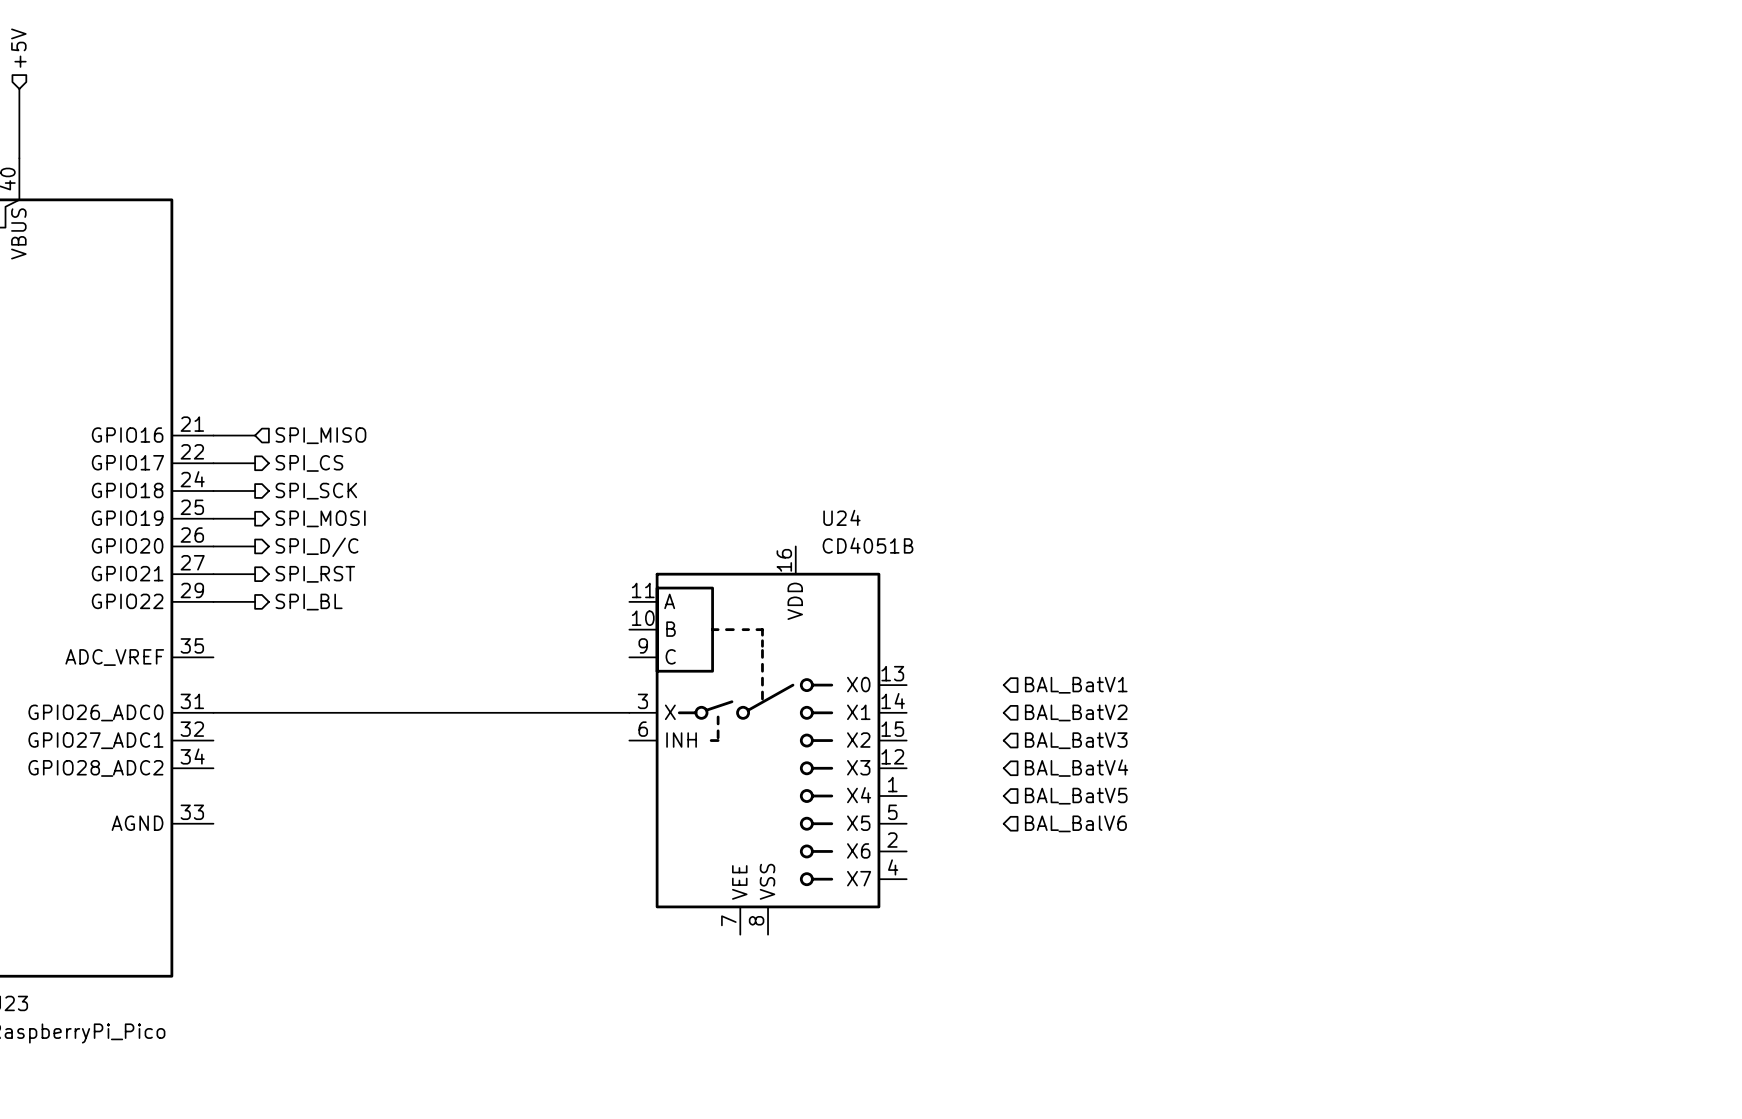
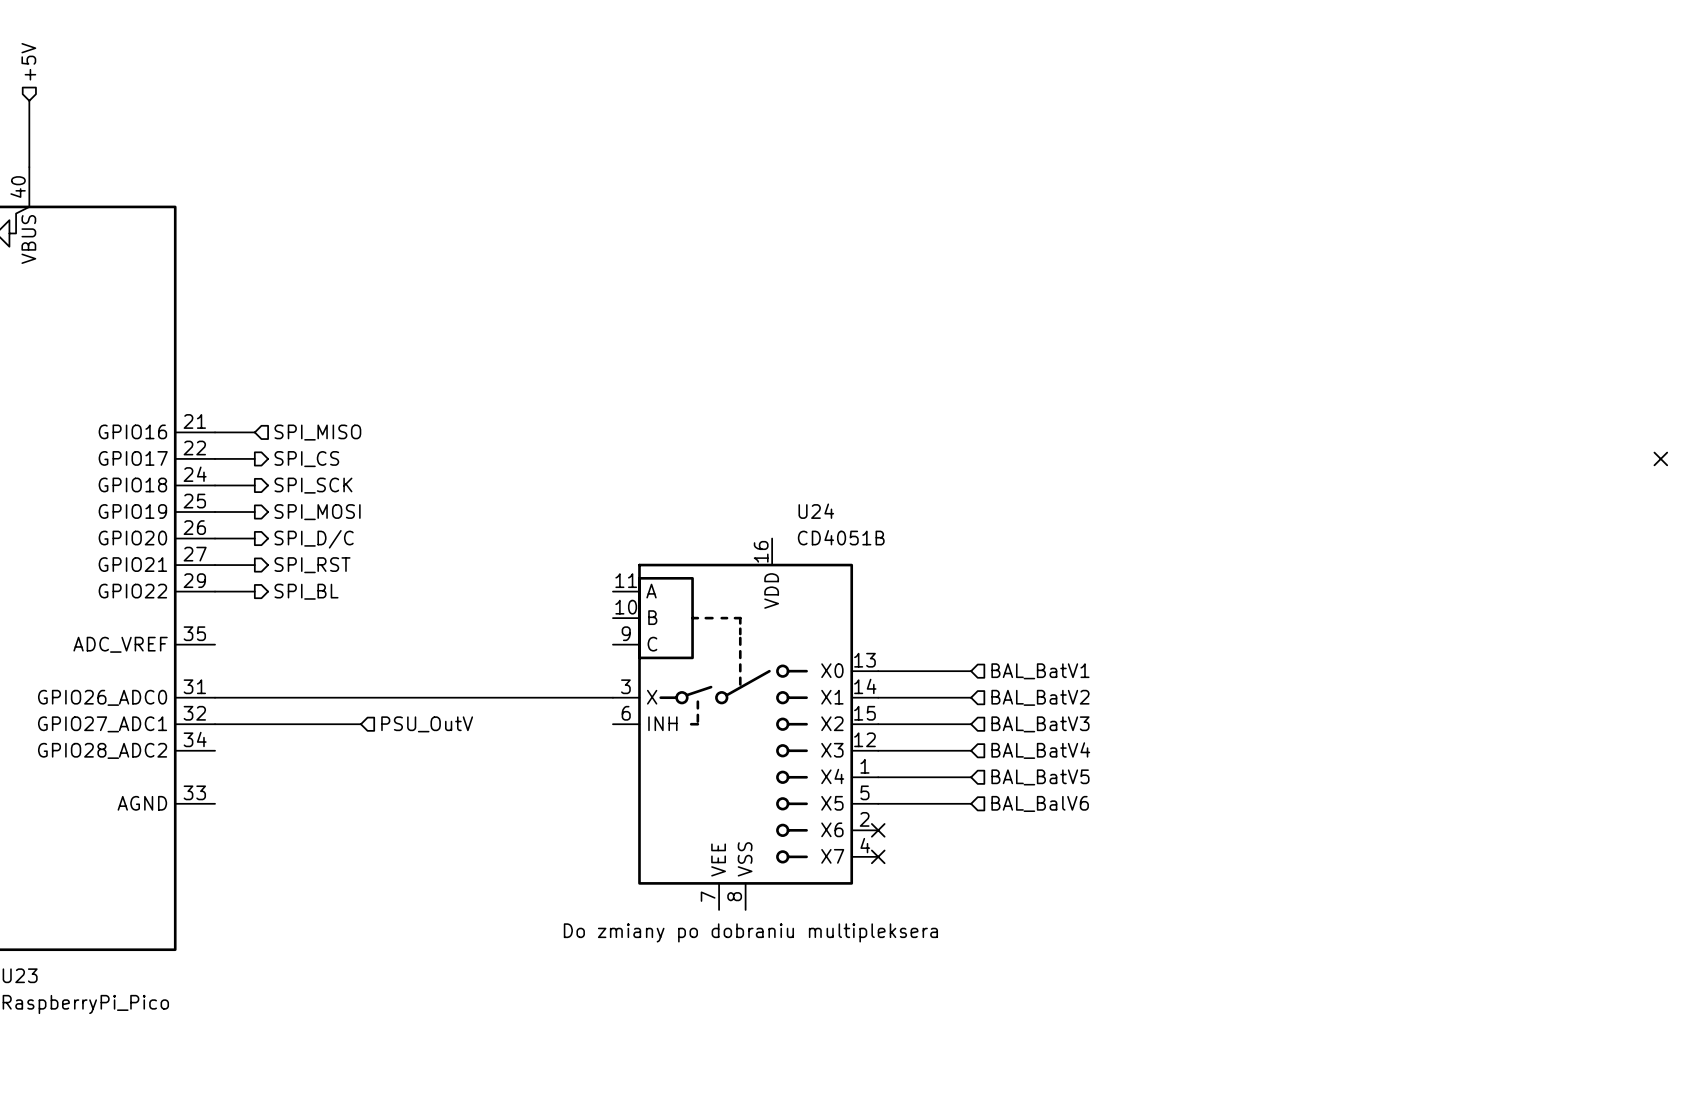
no-connect mark: none -> (1660, 458)
wire: none -> (878, 671) (971, 671)
wire: none -> (878, 697) (971, 697)
wire: none -> (215, 724) (360, 724)
hierarchical label: none -> PSU_OutV (427, 724)
wire: none -> (878, 724) (971, 724)
wire: none -> (878, 750) (971, 750)
wire: none -> (878, 777) (971, 777)
wire: none -> (878, 803) (971, 803)
no-connect mark: none -> (878, 830)
no-connect mark: none -> (878, 856)
text: none -> Do zmiany po dobraniu multipleksera (750, 932)

